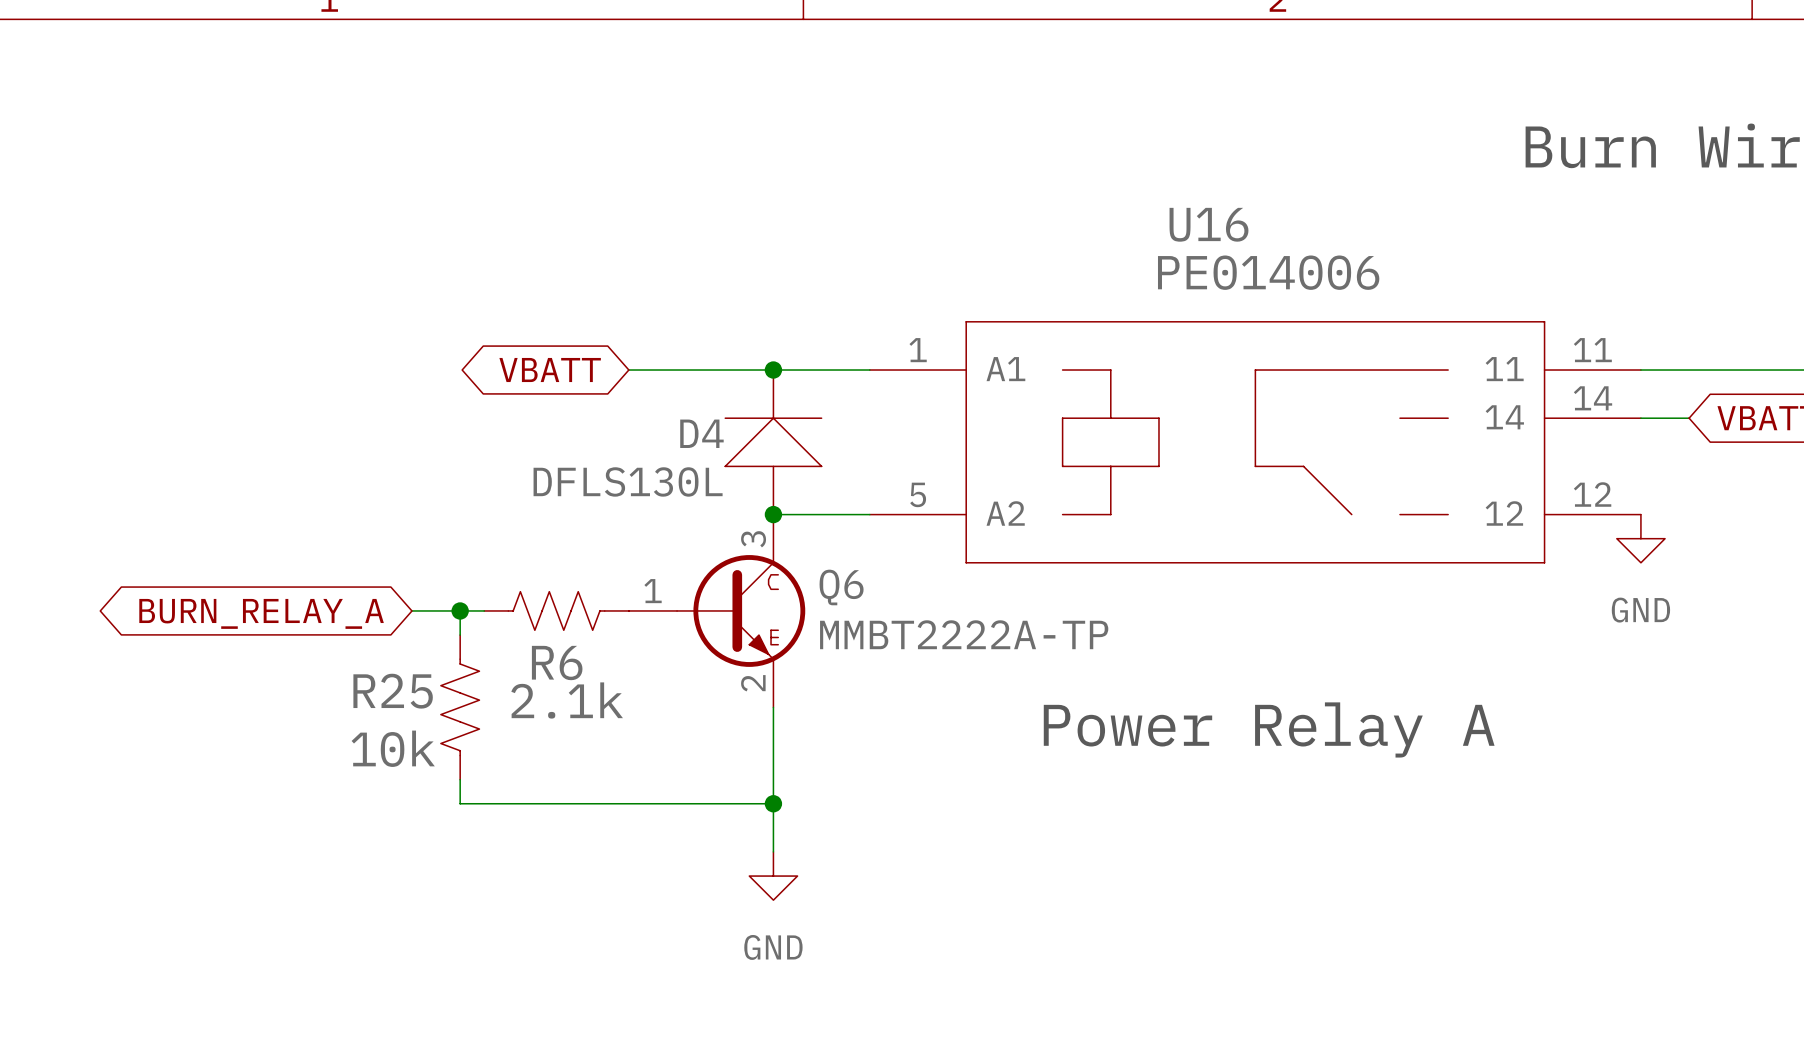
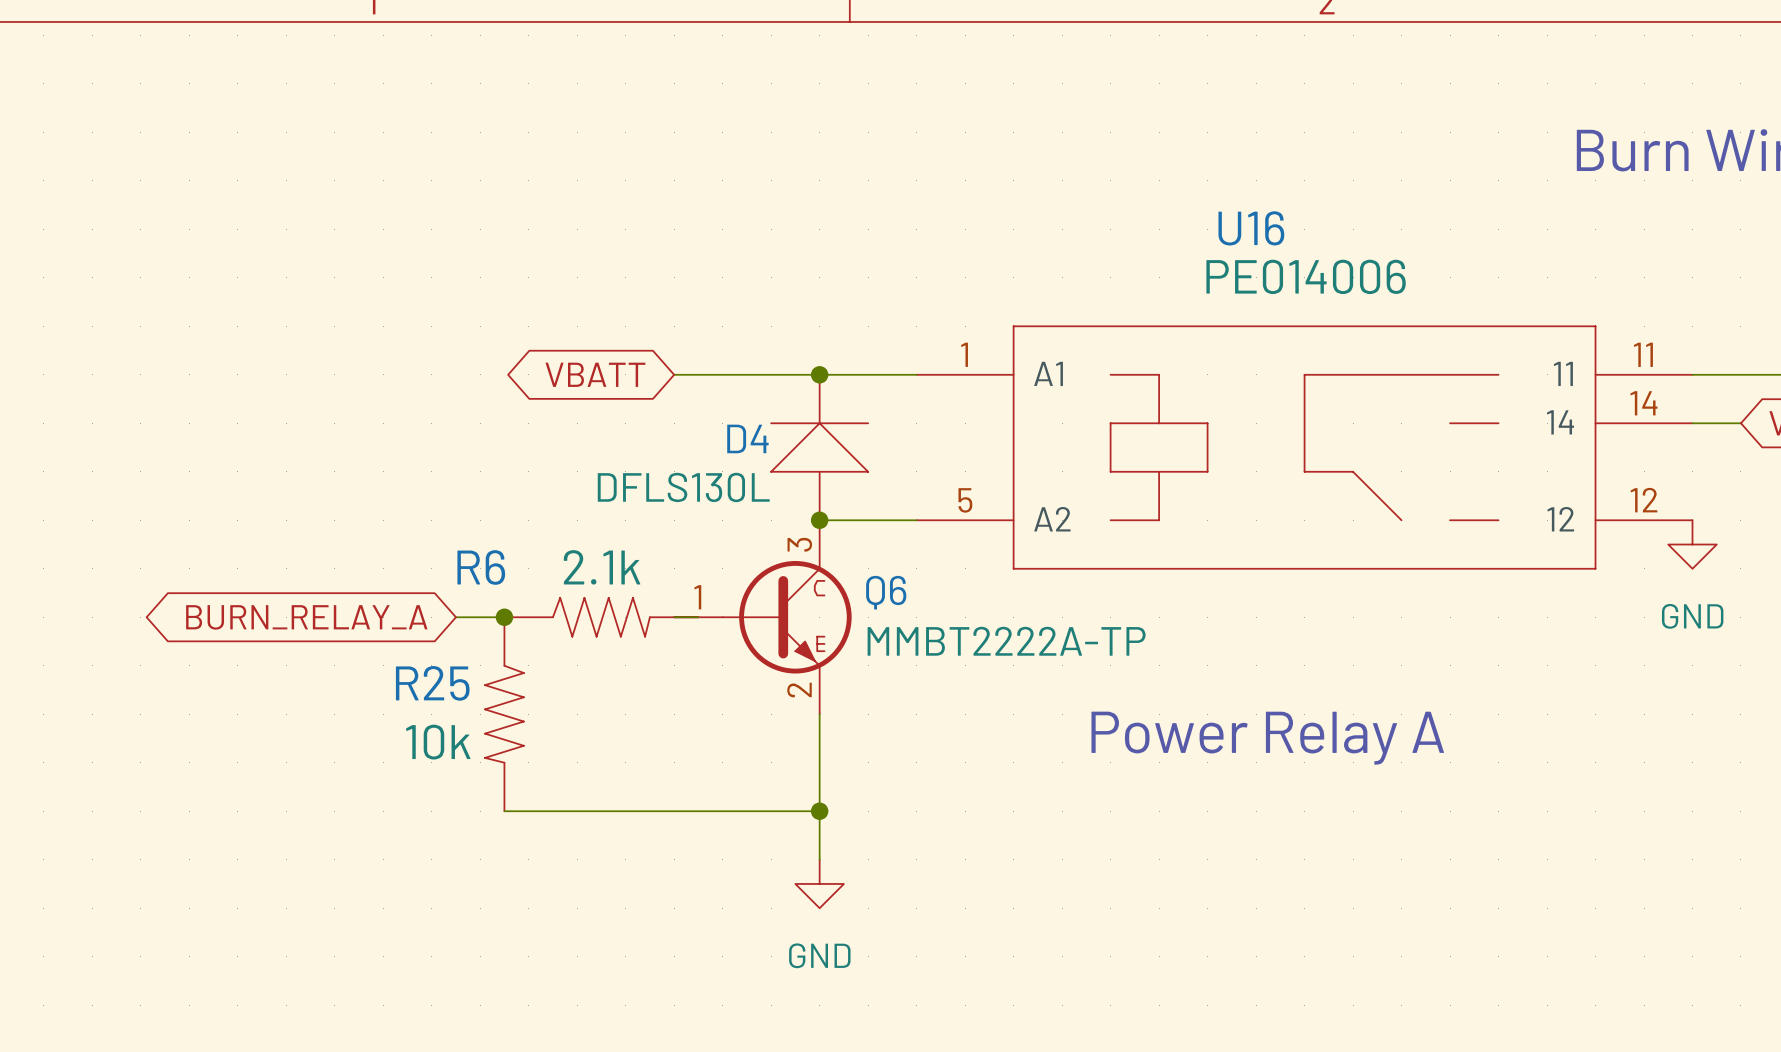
R6 symbol: [484, 591, 629, 631] -> [504, 597, 699, 637]
R25 symbol: [440, 635, 480, 780] -> [485, 617, 524, 812]
R6 name position: R6 (557, 663) -> R6 (481, 567)
R6 value position: 2.1k (567, 700) -> 2.1k (602, 567)

